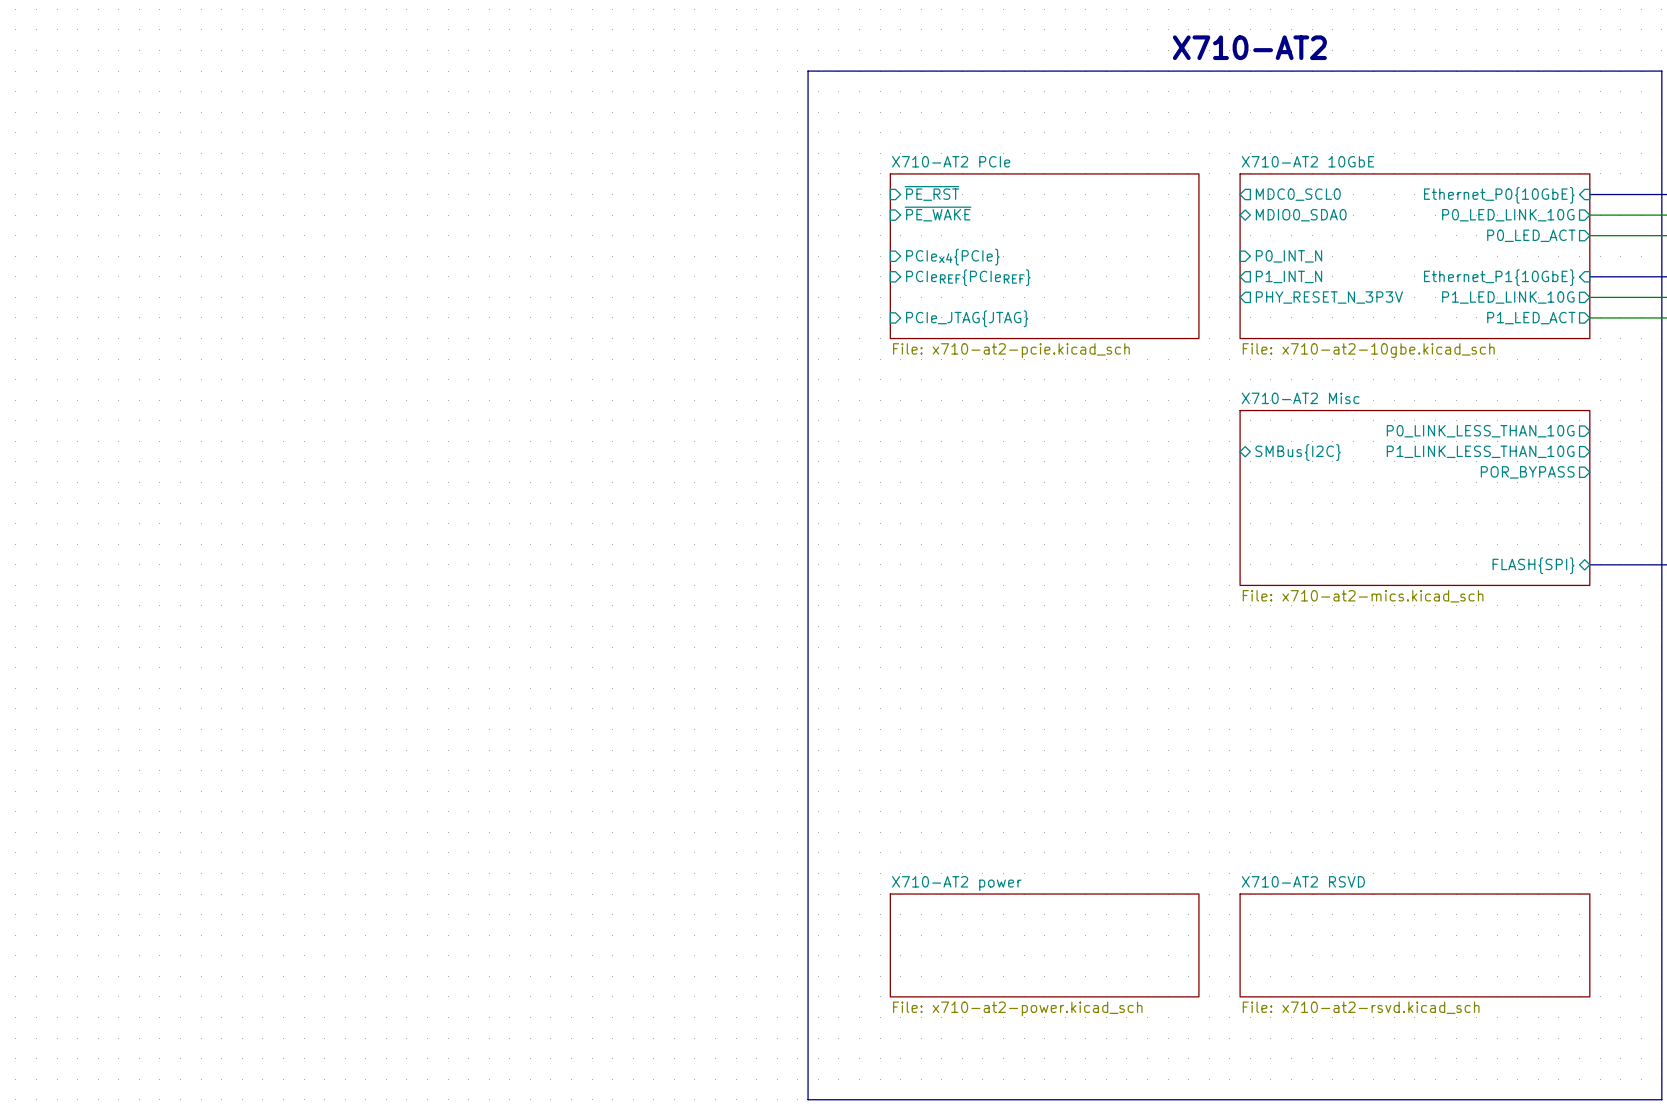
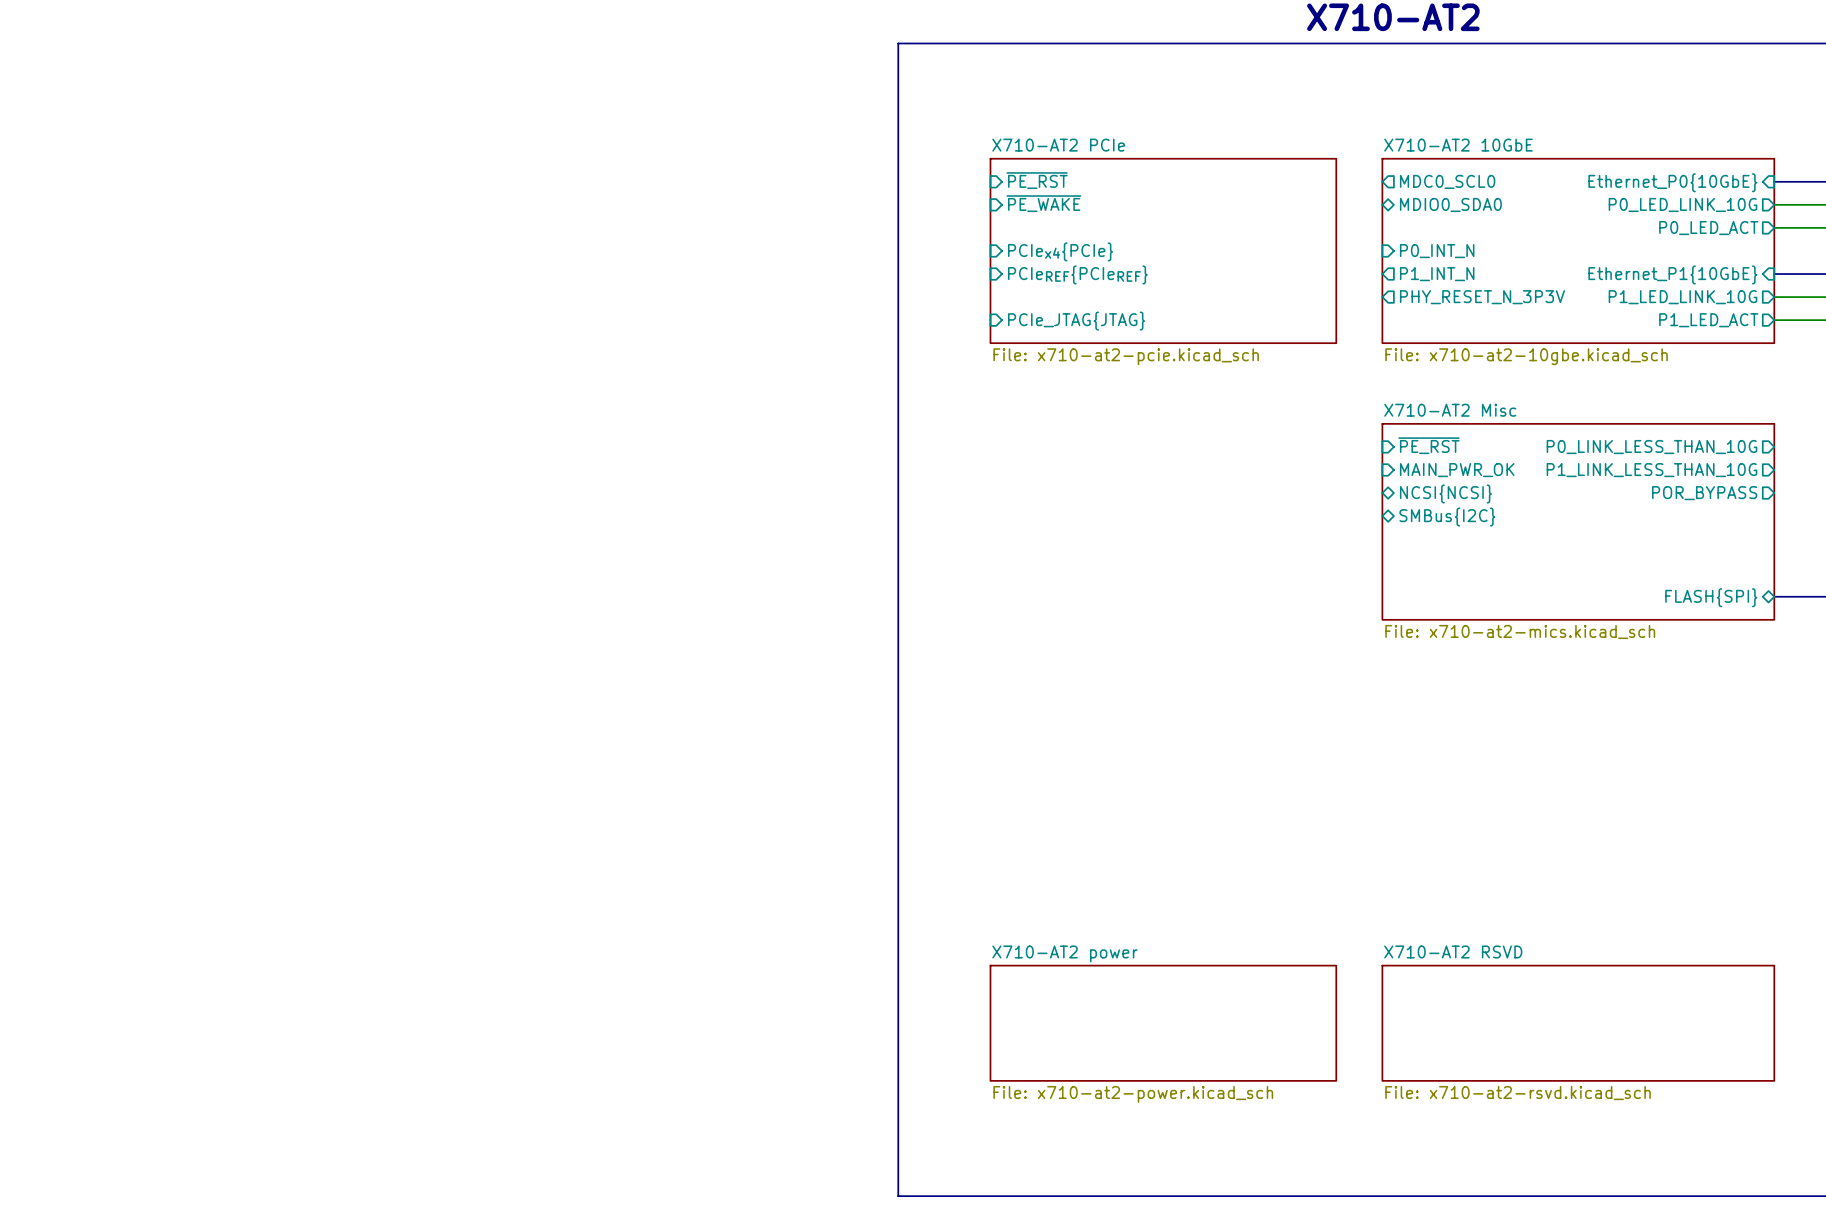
sheet pin: none -> ~{PE_RST} (1428, 445)
sheet pin shape: bidirectional (1298, 452) -> input (1457, 470)
sheet pin: SMBus{I2C} (1298, 452) -> MAIN_PWR_OK (1457, 470)
sheet pin: none -> NCSI{NCSI} (1445, 493)
sheet pin: none -> SMBus{I2C} (1447, 517)

